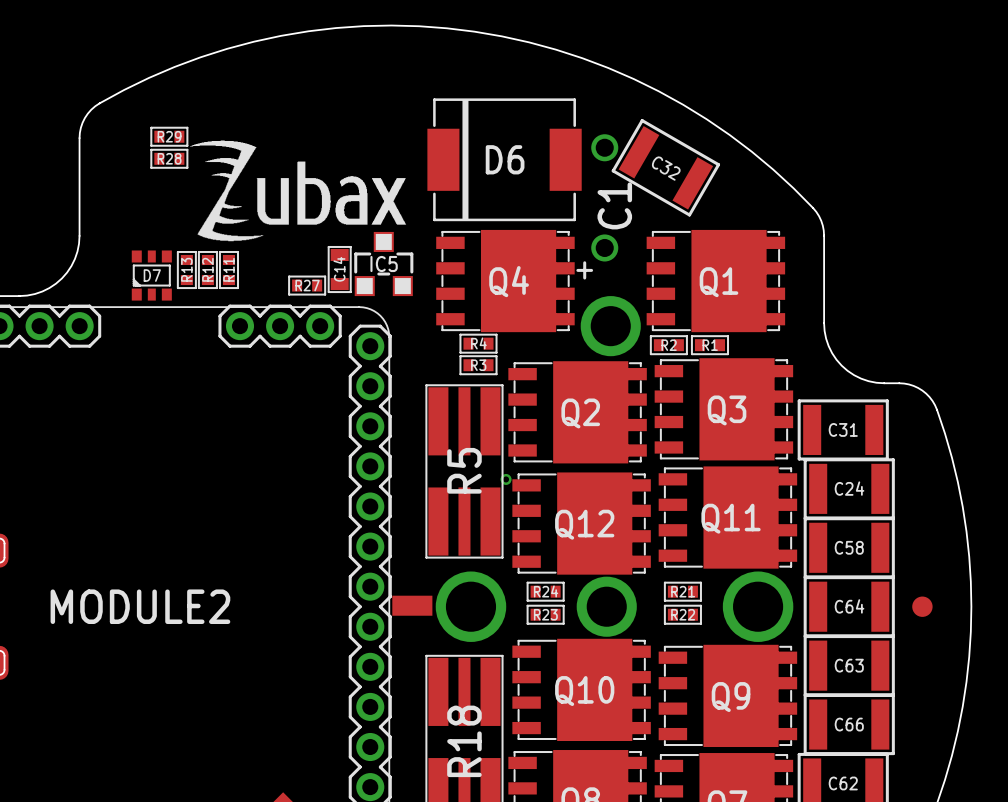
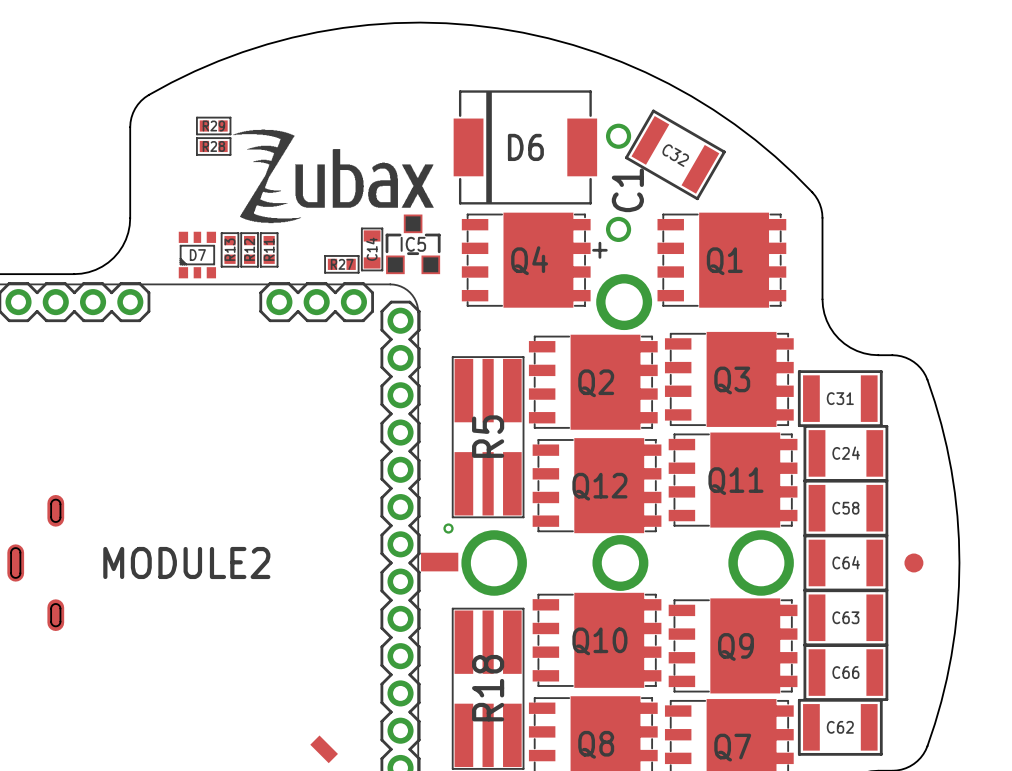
R4: (478, 343) -> none
R2: (668, 345) -> none
R1: (709, 345) -> none
R3: (478, 365) -> none
part position: (506, 479) -> (448, 528)
R24: (545, 591) -> none
R21: (682, 591) -> none
R23: (545, 614) -> none
R22: (682, 614) -> none

